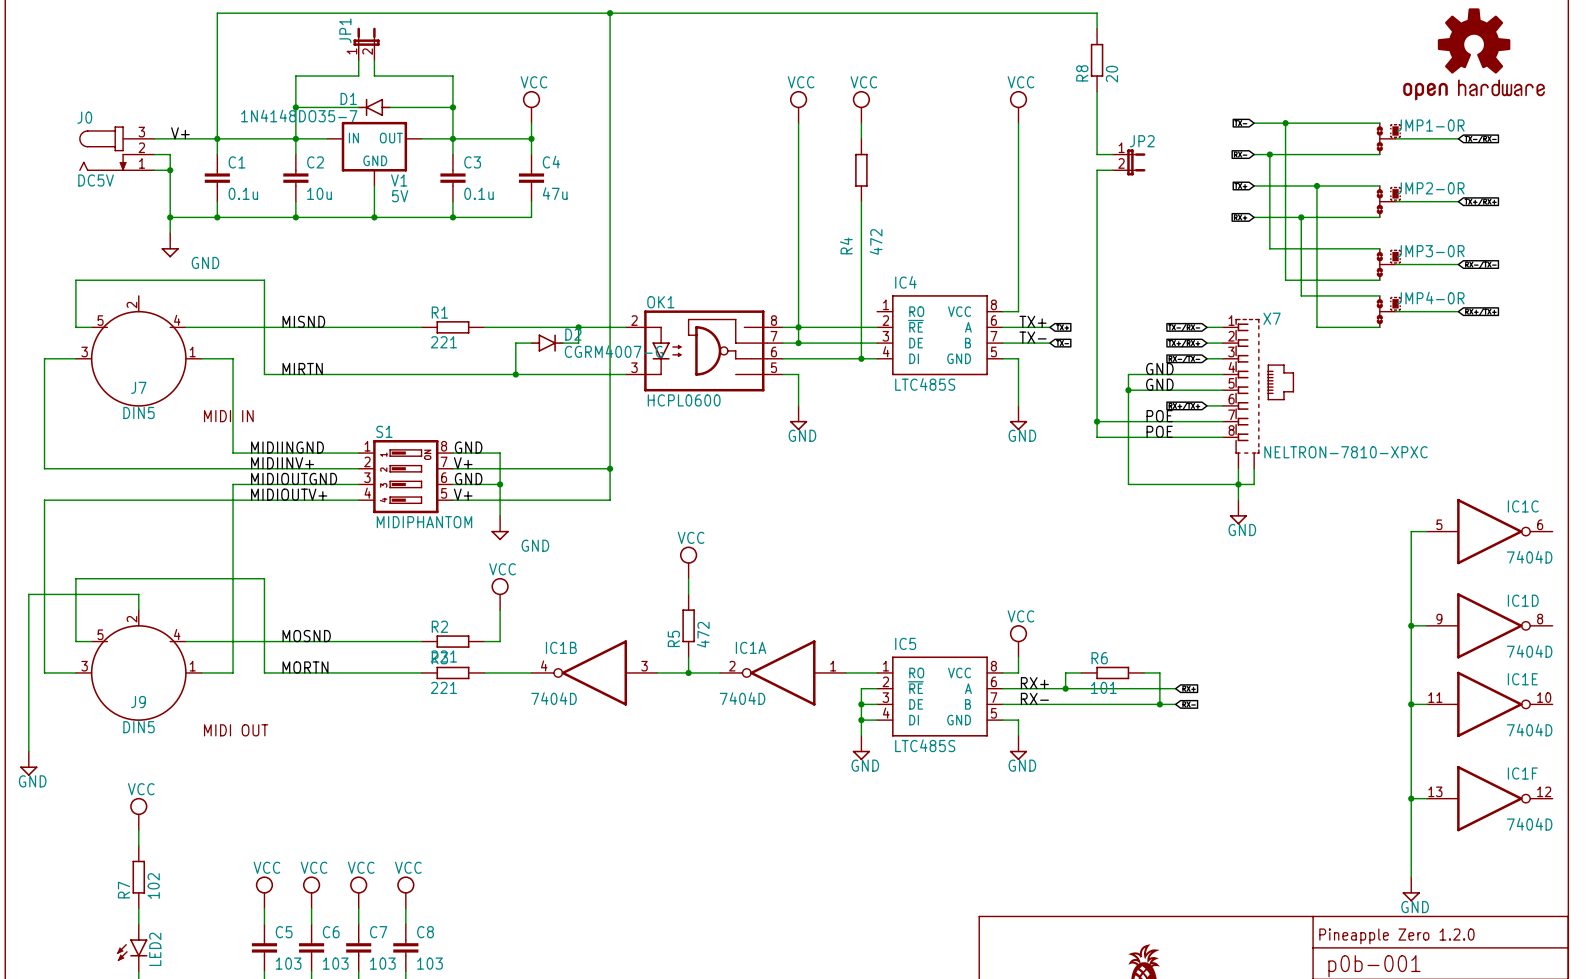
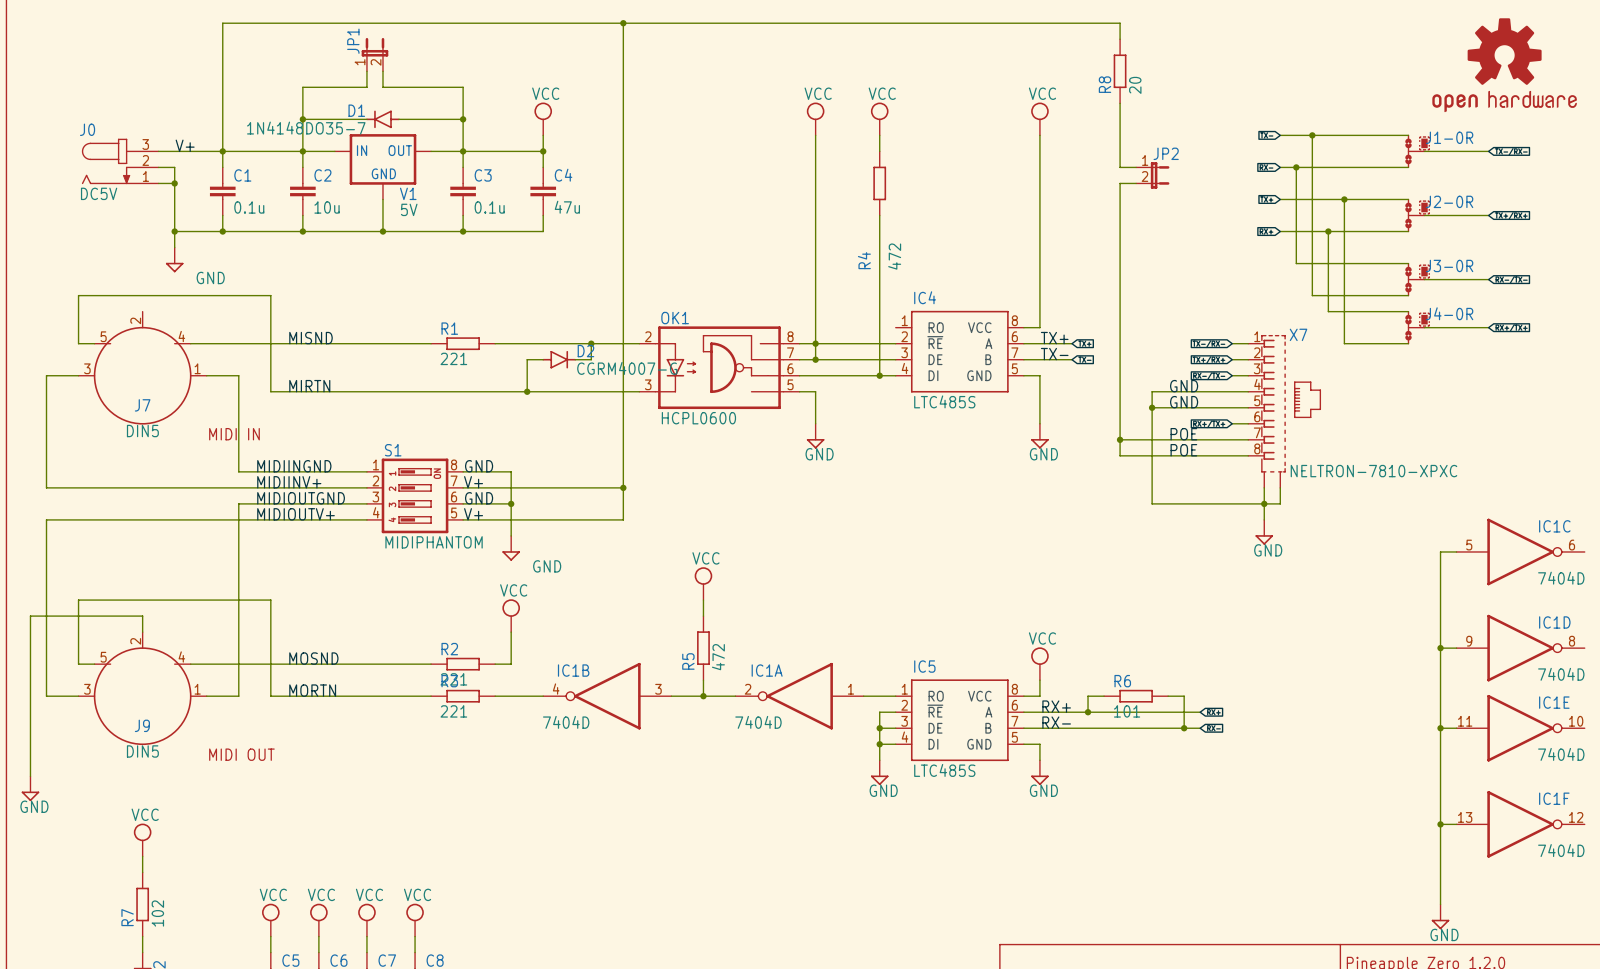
JMP1-0R name: JMP1-0R (1430, 125) -> J1-0R (1449, 137)
JMP2-0R name: JMP2-0R (1430, 188) -> J2-0R (1449, 201)
JMP3-0R name: JMP3-0R (1430, 251) -> J3-0R (1449, 265)
JMP4-0R name: JMP4-0R (1430, 298) -> J4-0R (1449, 313)

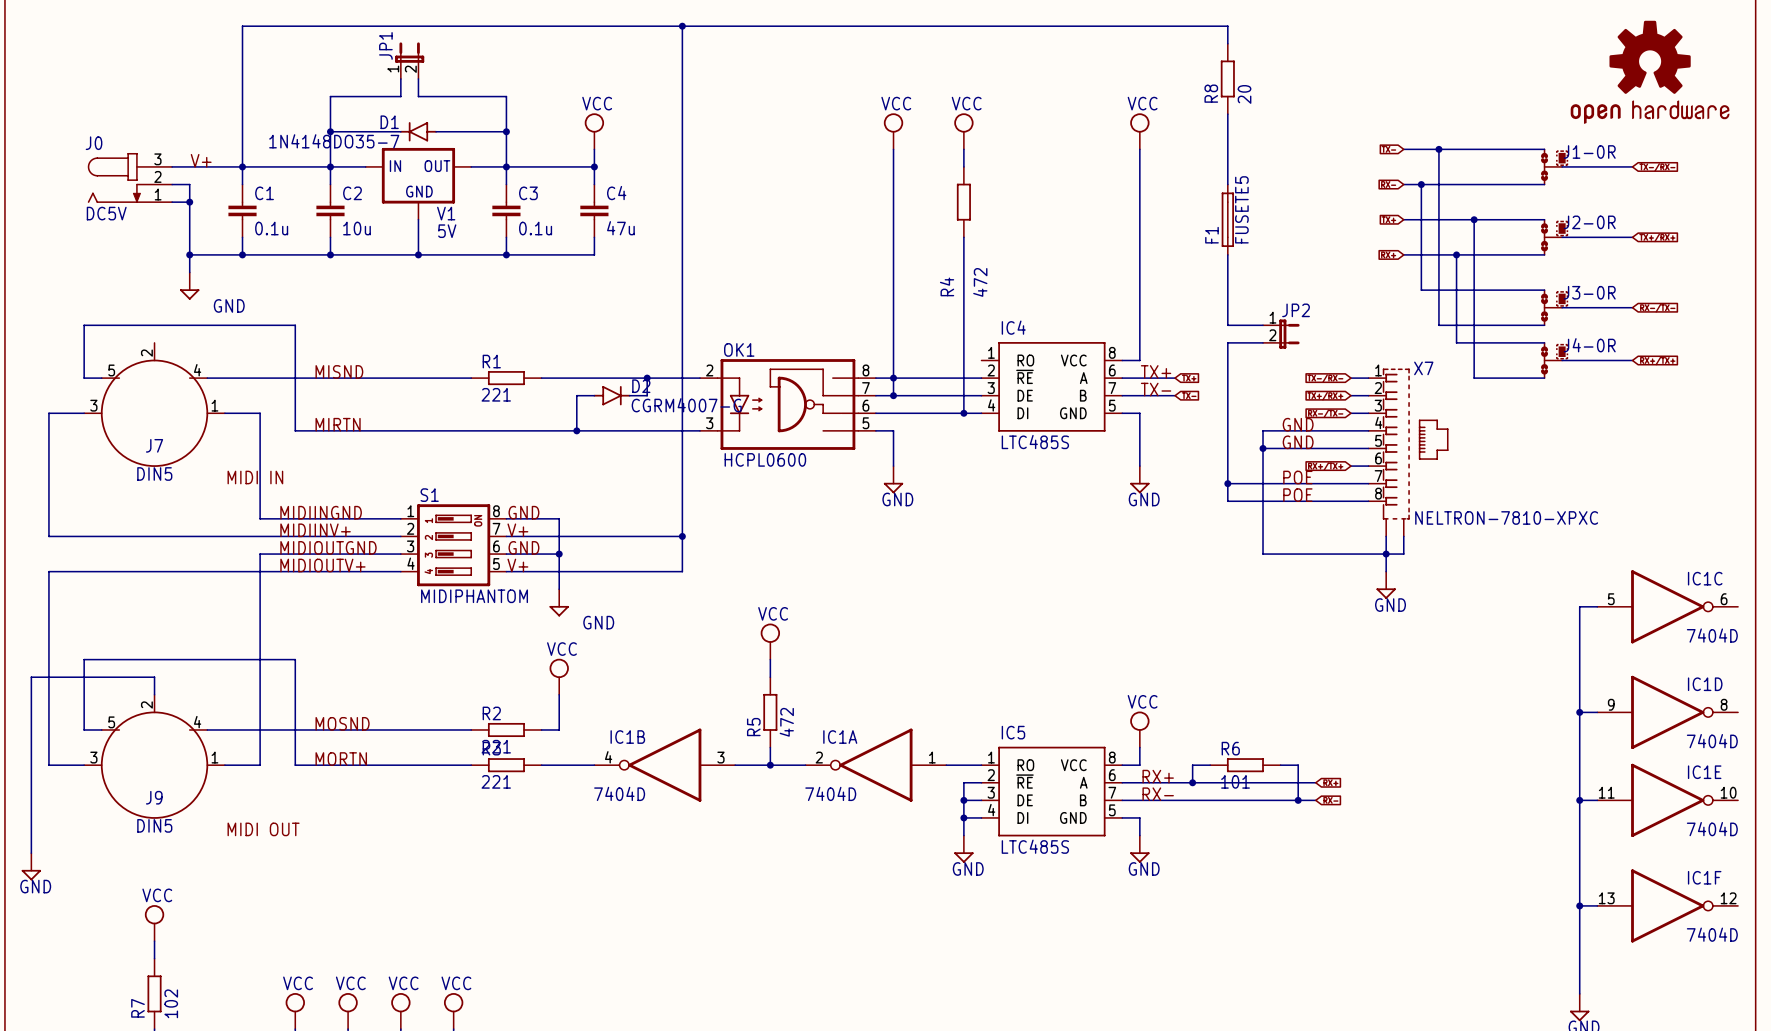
wire: (1120, 167) (1136, 167) -> none
JP2 position: (1152, 175) -> (1281, 334)
F1: none -> FUSETE5 (1227, 219)
wire: (1120, 295) (1120, 311) -> (1227, 325) (1263, 325)
wire: none -> (1227, 342) (1263, 342)

